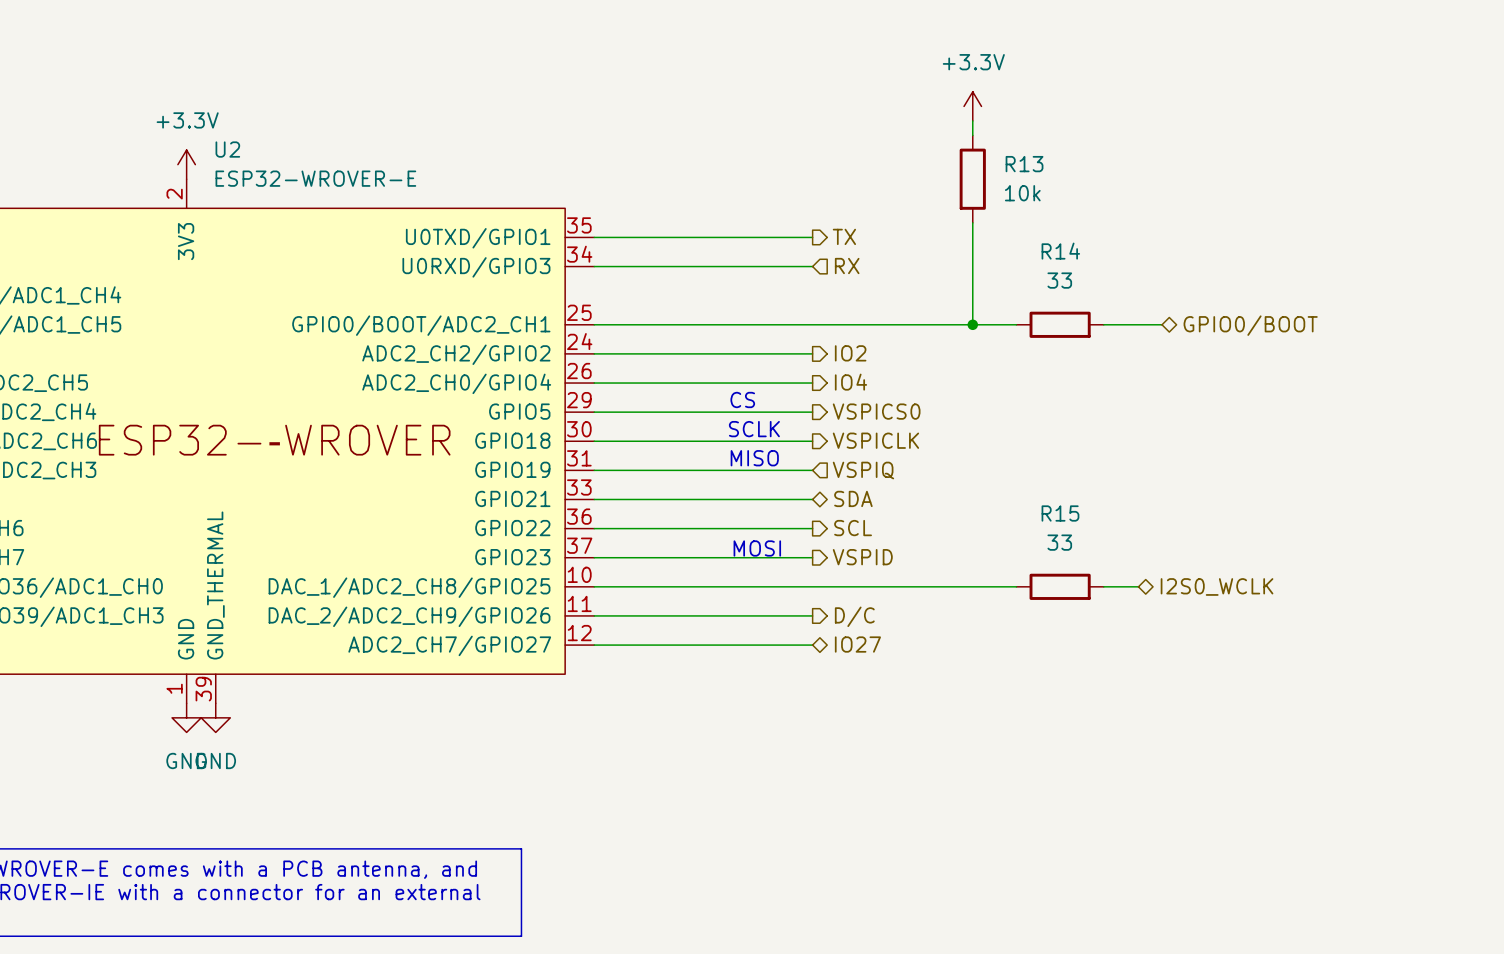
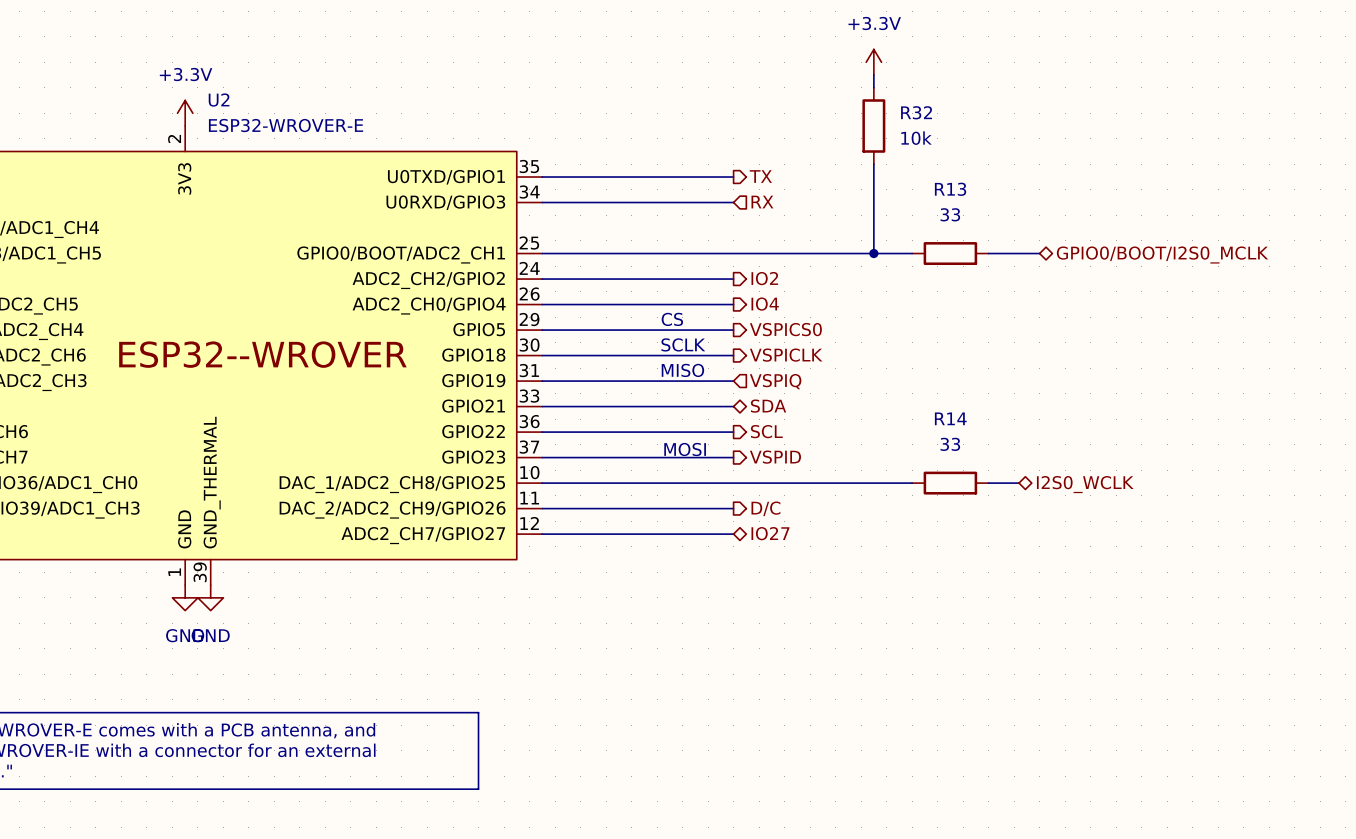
R13 name: R13 (1024, 164) -> R32 (916, 112)
R14 name: R14 (1060, 251) -> R13 (950, 189)
hierarchical label: GPIO0/BOOT (1250, 325) -> GPIO0/BOOT/I2S0_MCLK (1162, 255)
R15 name: R15 (1060, 513) -> R14 (950, 418)

